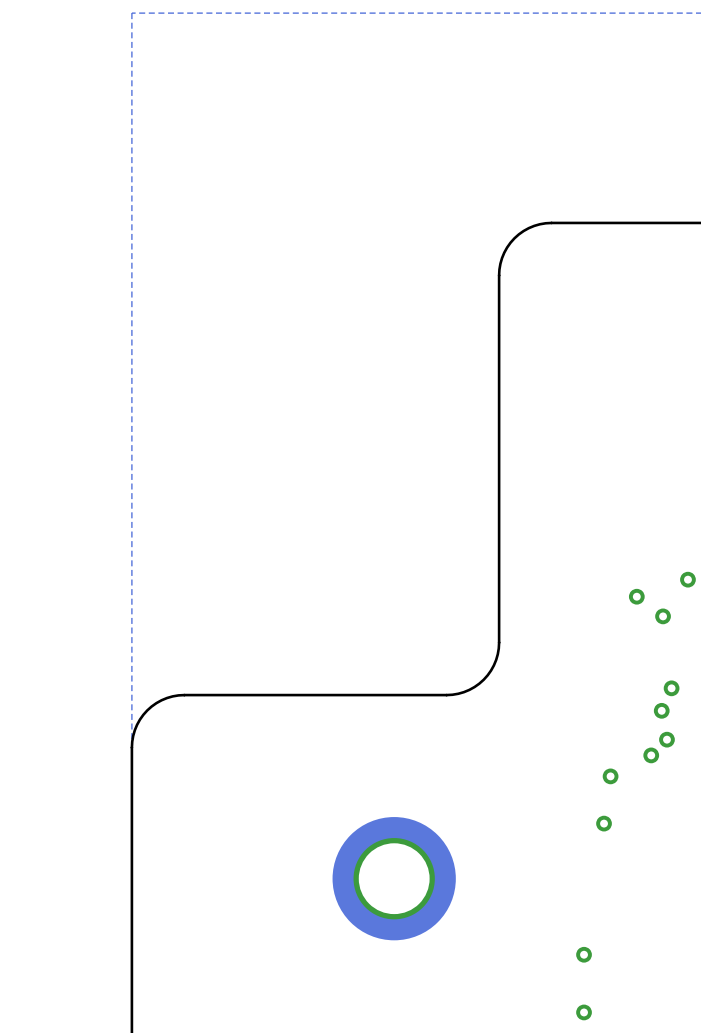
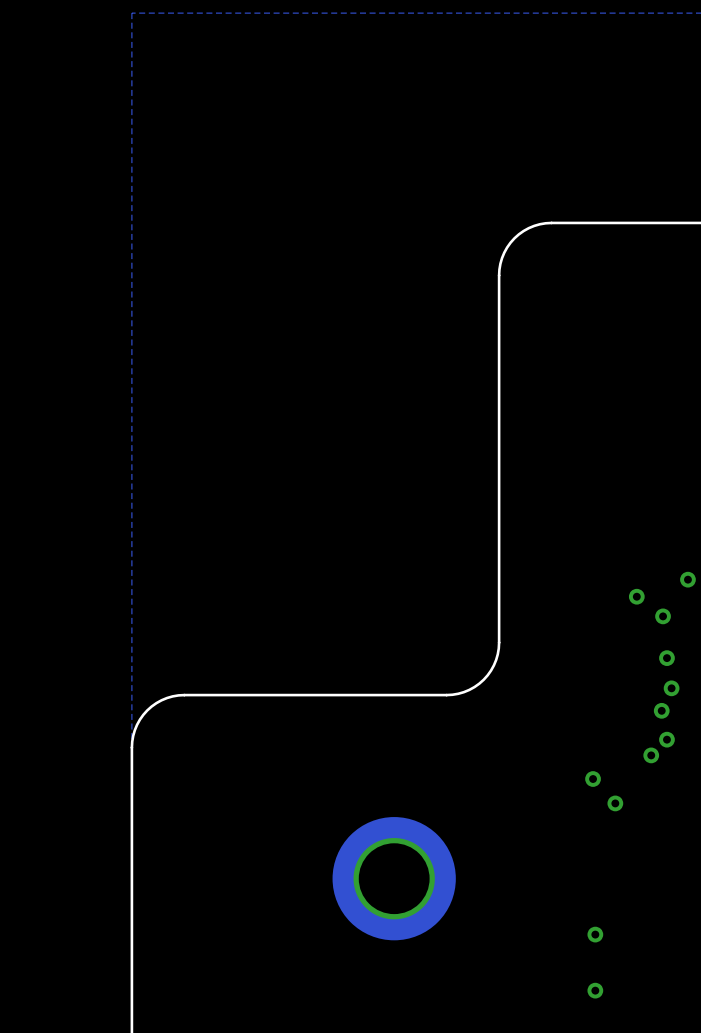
via: none -> (666, 658)
via: (610, 776) -> none
via: none -> (593, 779)
via: none -> (615, 803)
via: (604, 823) -> none
via: none -> (595, 934)
via: (584, 954) -> none
via: none -> (595, 990)
via: (584, 1012) -> none

